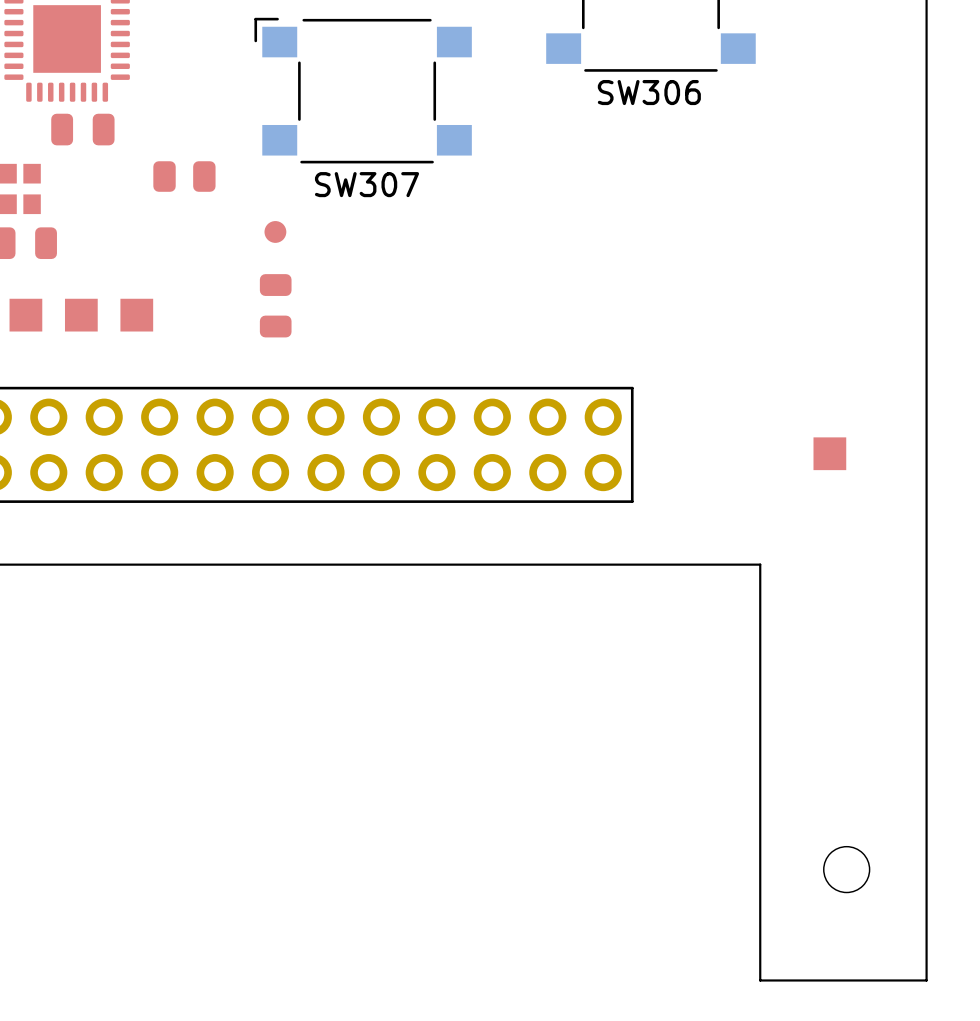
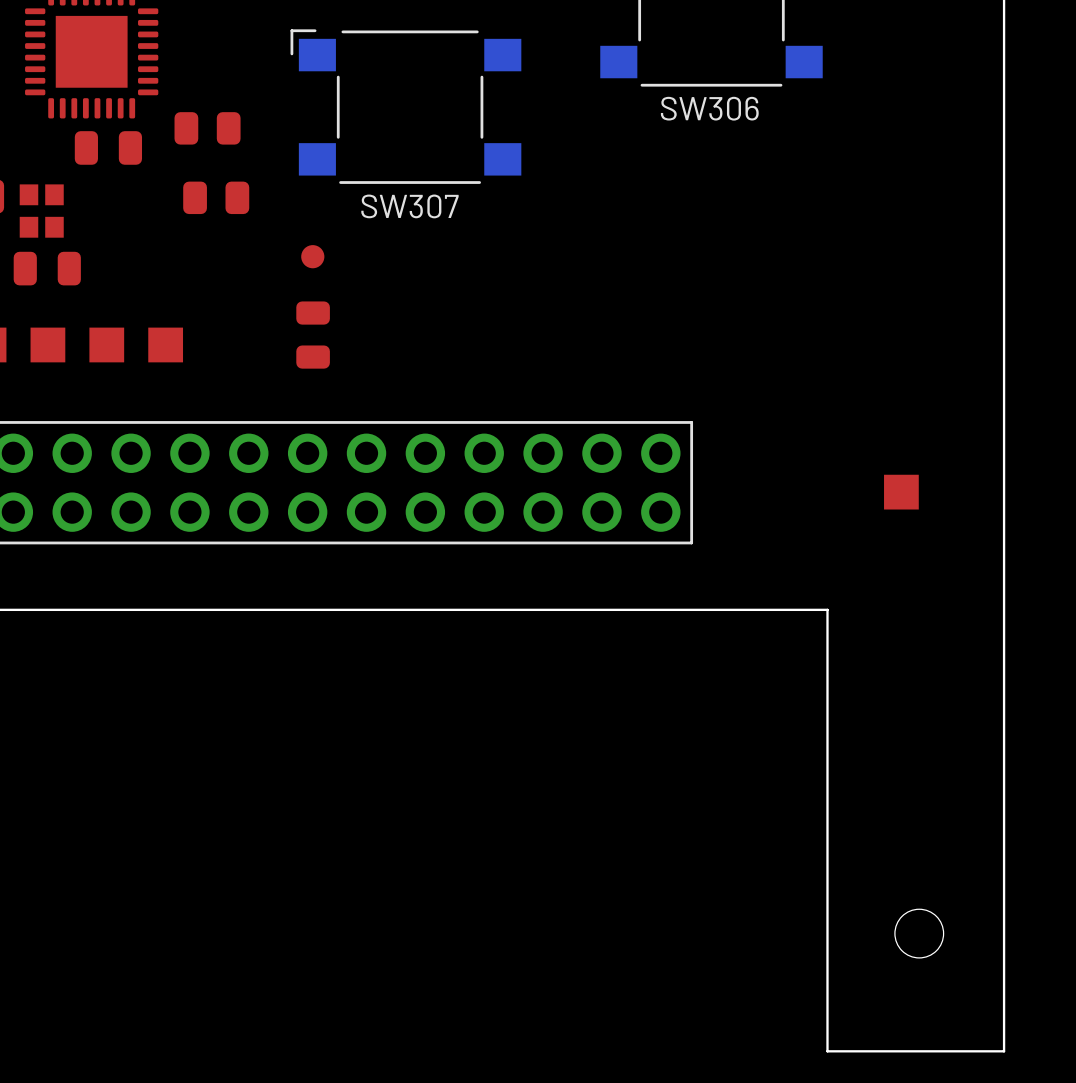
part: none -> (207, 128)

